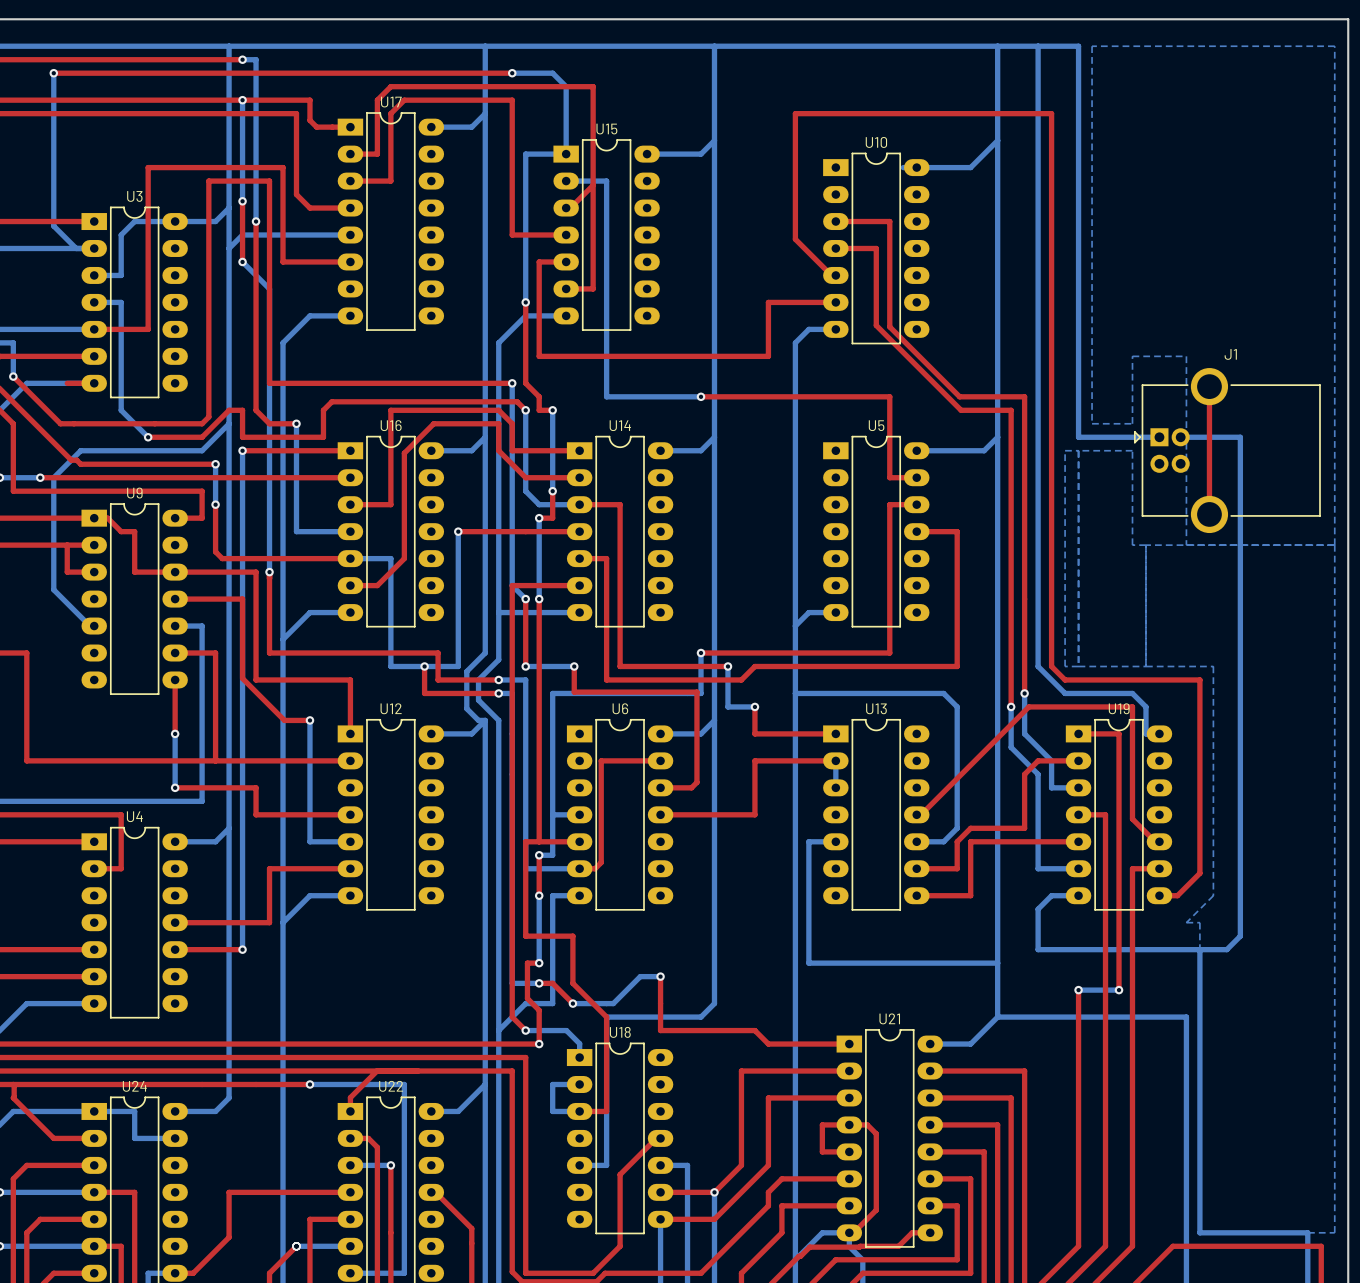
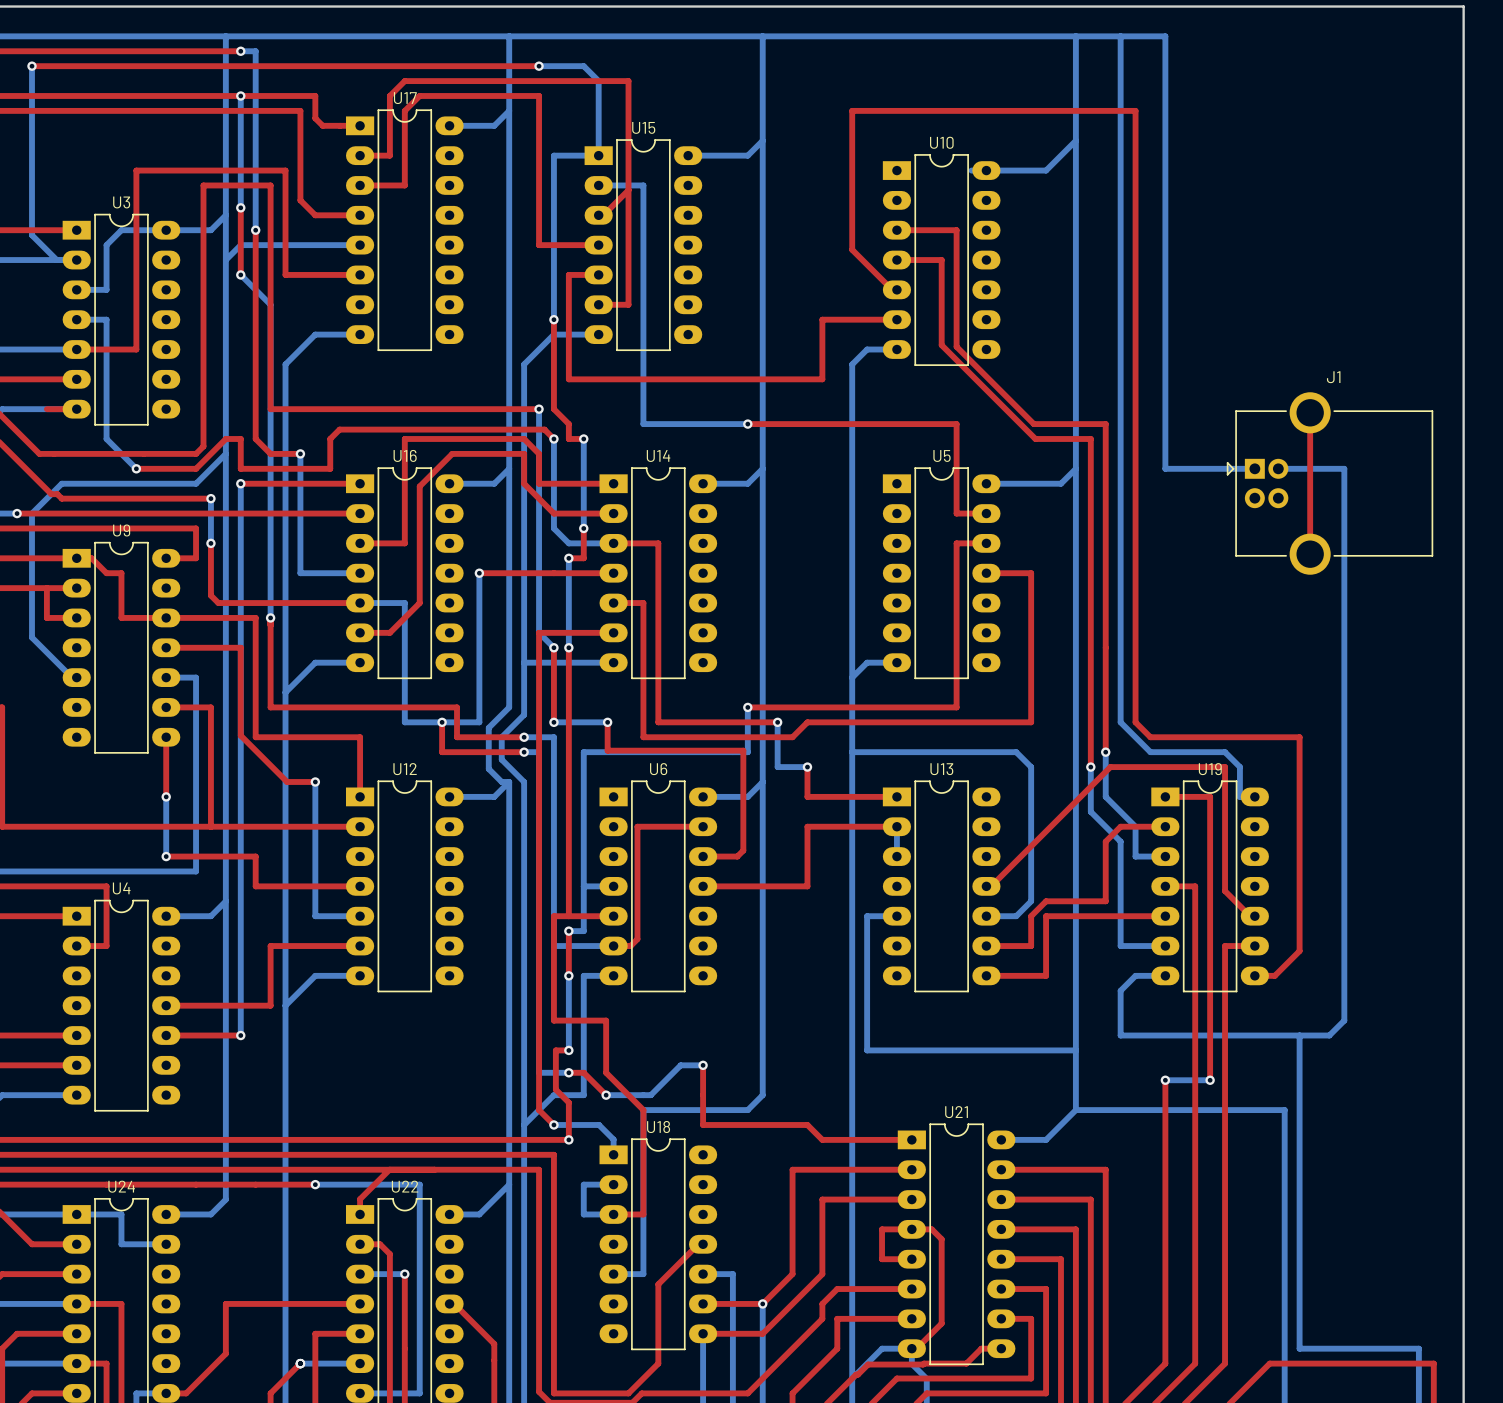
bottom zone outline: (1078, 450) (1078, 666) -> none
bottom zone outline: (1145, 545) (1145, 666) -> none
bottom zone outline: (1186, 545) (1186, 356) (1132, 356) (1132, 423) (1092, 423) (1092, 46) (1334, 46) (1334, 1232) (1199, 1232) (1199, 922) (1186, 922) (1213, 895) (1213, 666) (1065, 666) (1065, 450) (1132, 450) (1132, 545) (1334, 545) -> none

